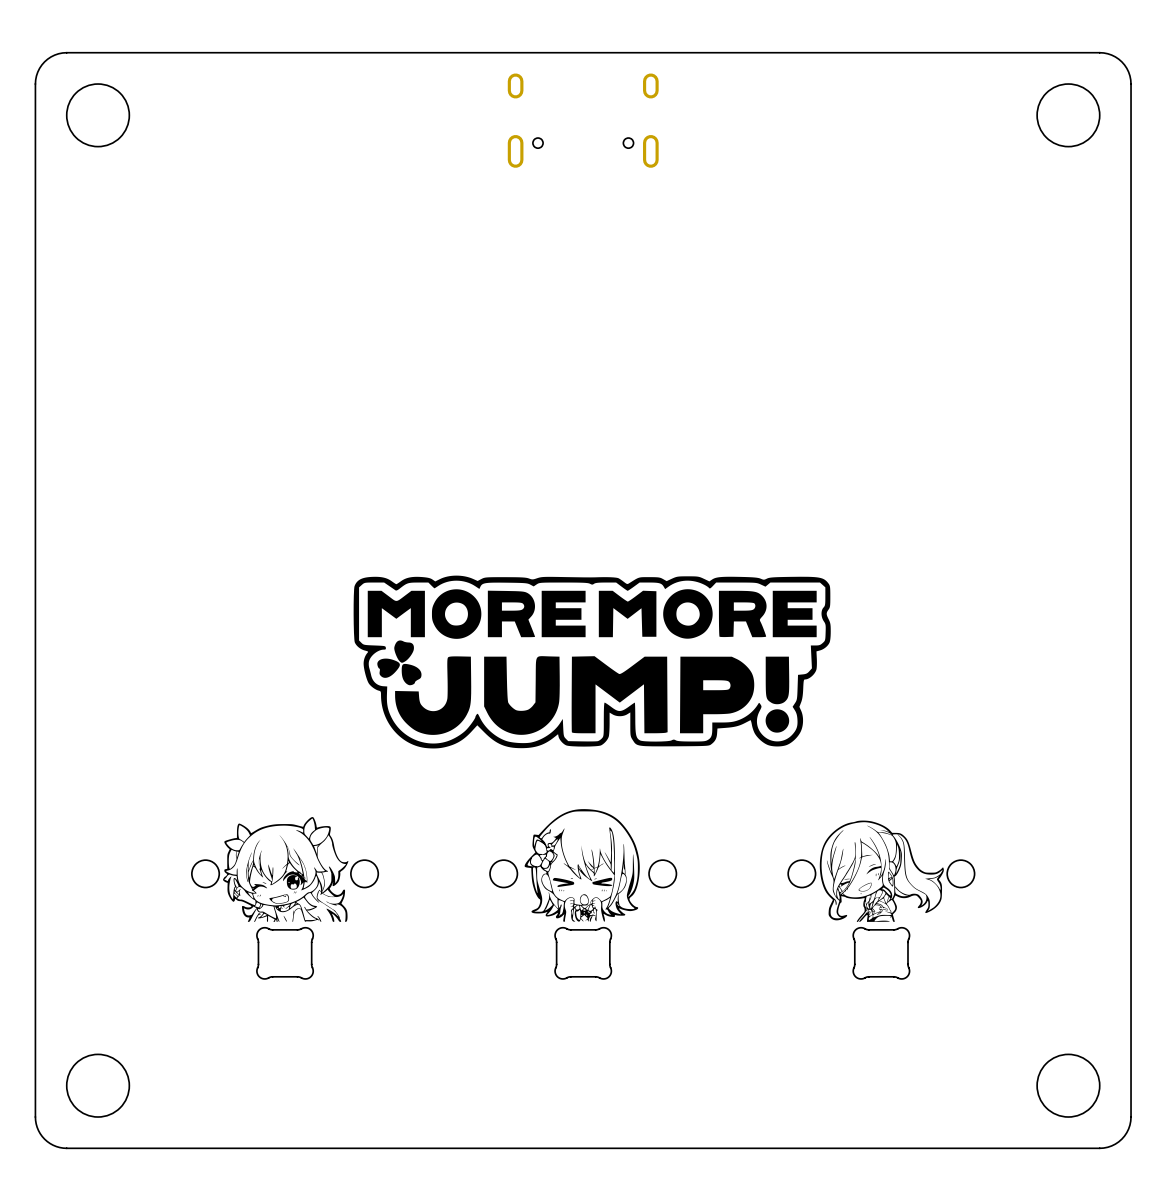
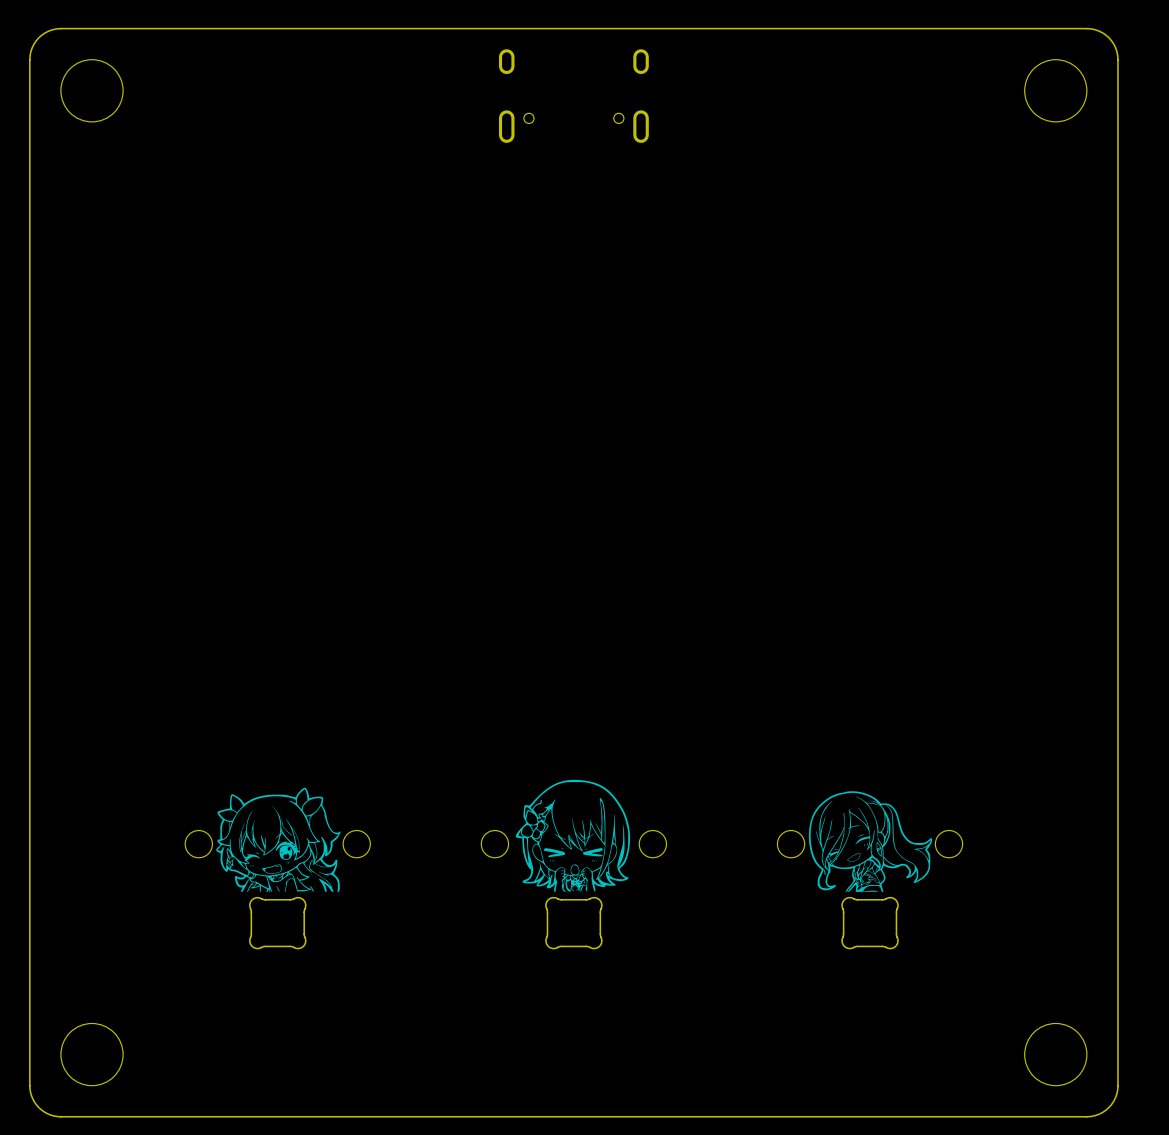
drawing: [353, 575, 831, 749] -> none

